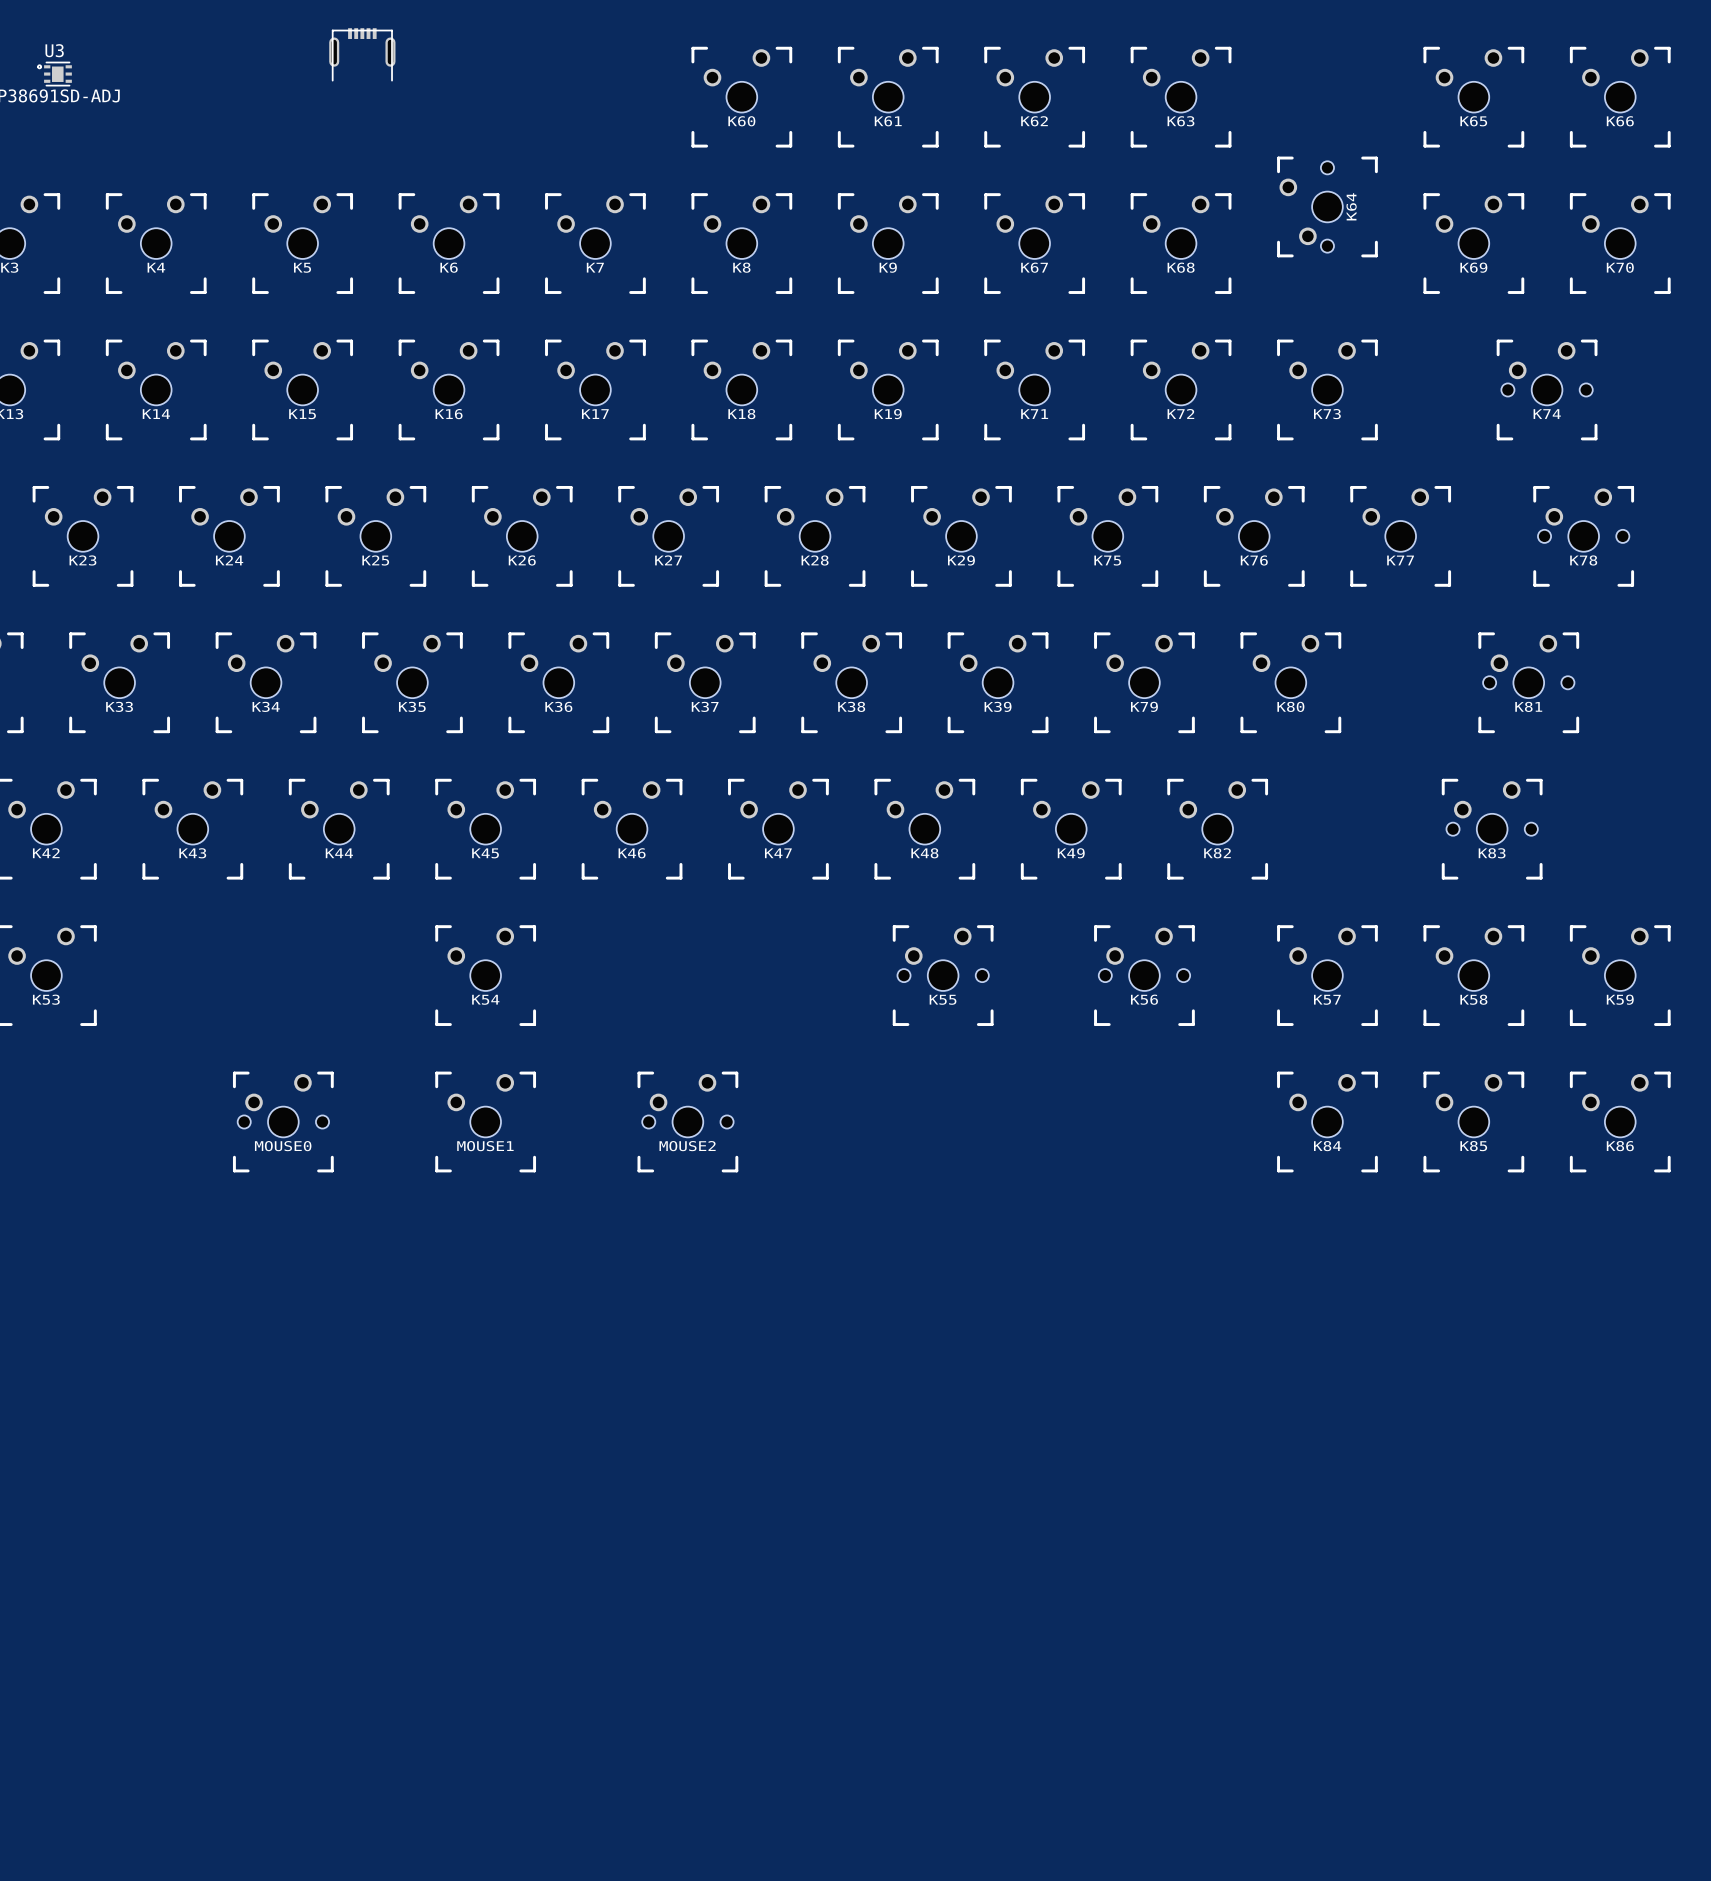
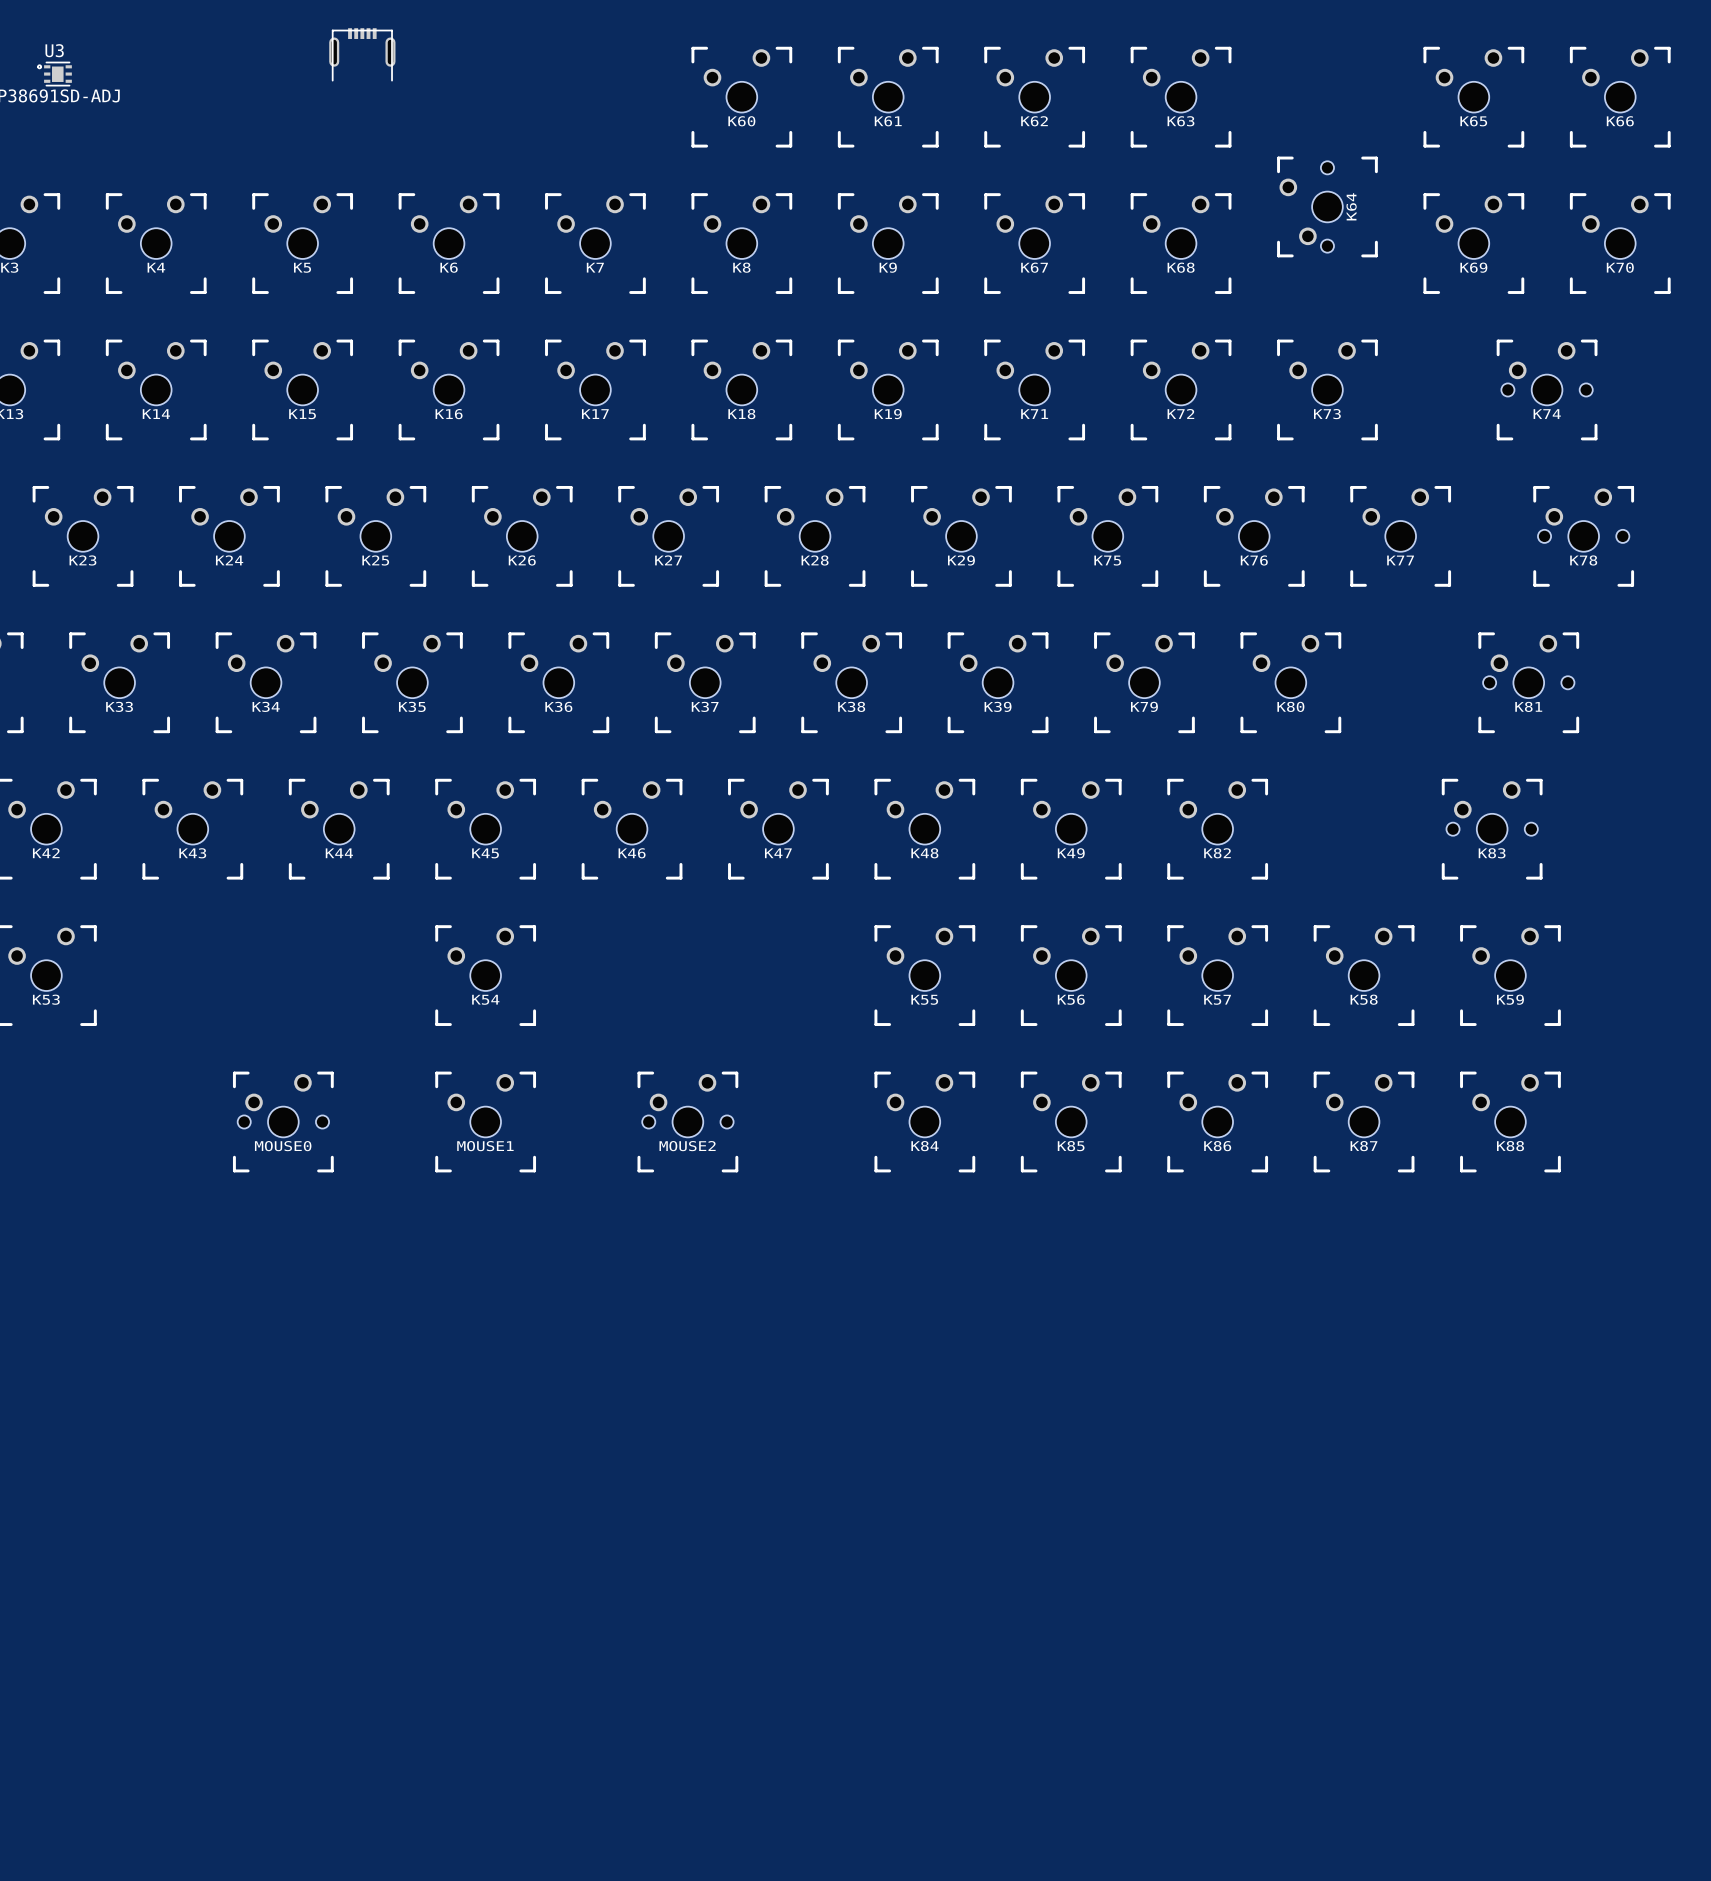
K55 footprint: [892, 925, 994, 1026] -> [874, 925, 976, 1026]
K56 footprint: [1094, 925, 1195, 1026] -> [1020, 925, 1122, 1026]
K57 position: (1327, 975) -> (1217, 975)
K58 position: (1473, 975) -> (1364, 975)
K59 position: (1620, 975) -> (1510, 975)
K84 position: (1327, 1121) -> (924, 1121)
K87: none -> (1364, 1121)
K85 position: (1473, 1121) -> (1071, 1121)
K88: none -> (1510, 1121)
K86 position: (1620, 1121) -> (1217, 1121)

